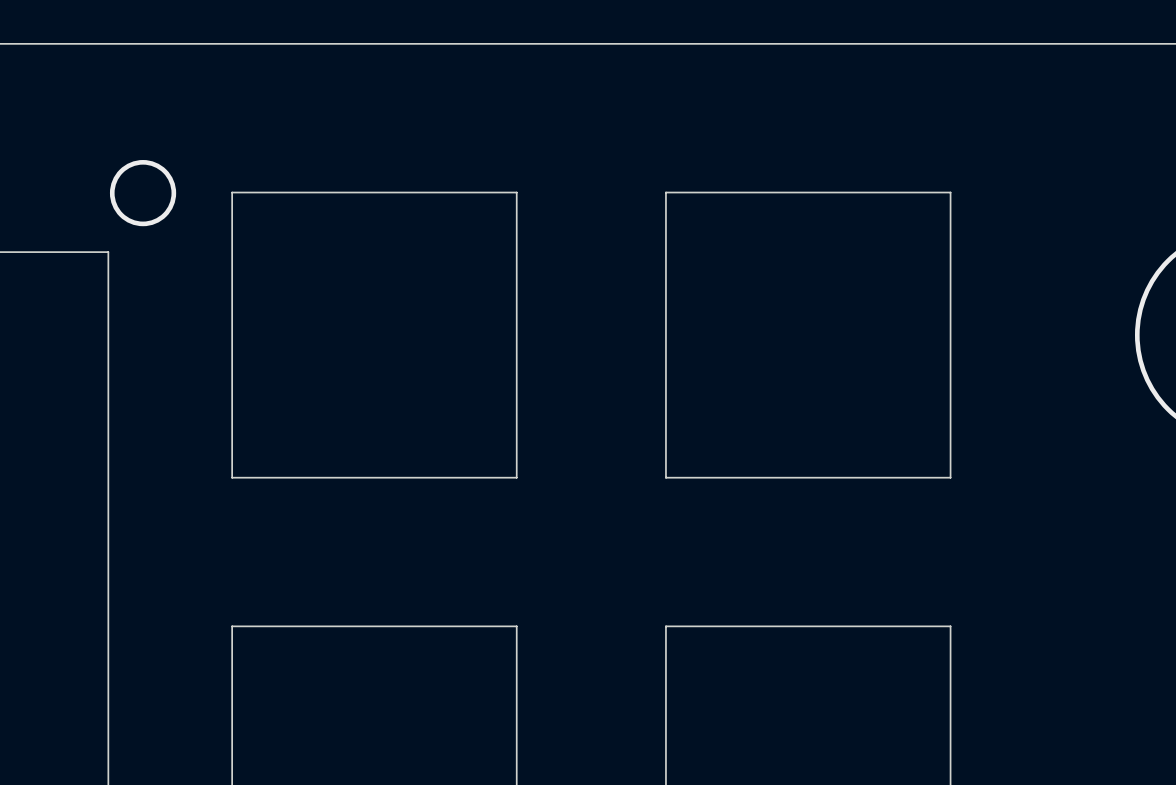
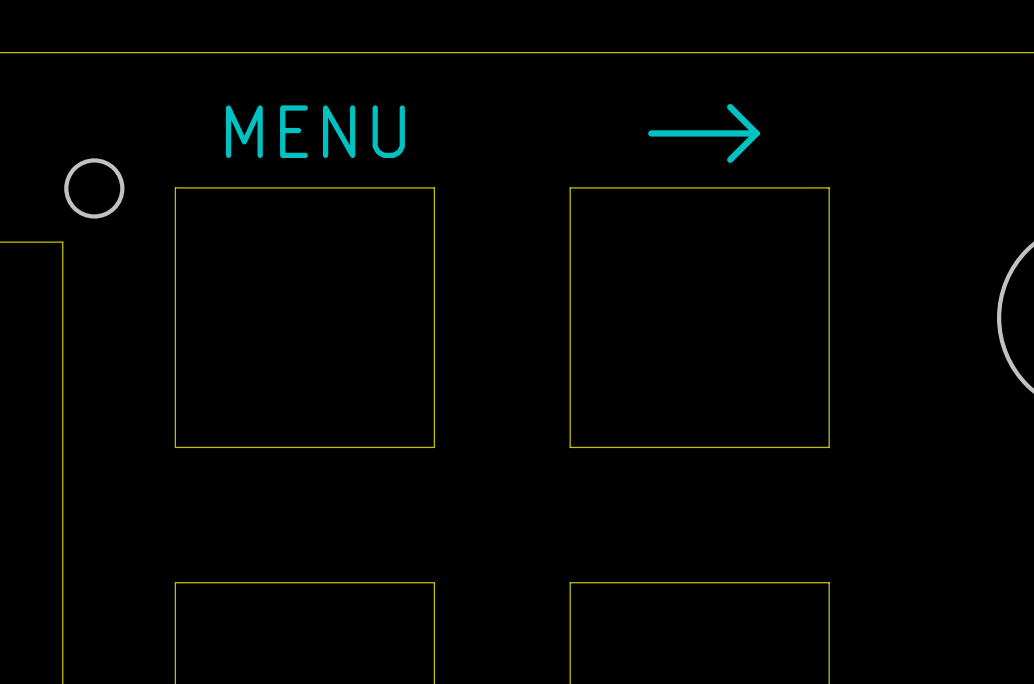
line: none -> (730, 107) (756, 133)
text: none -> MENU (315, 131)
line: none -> (651, 133) (756, 133)
line: none -> (756, 133) (730, 159)

